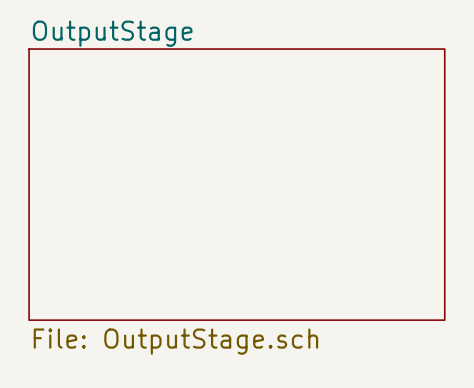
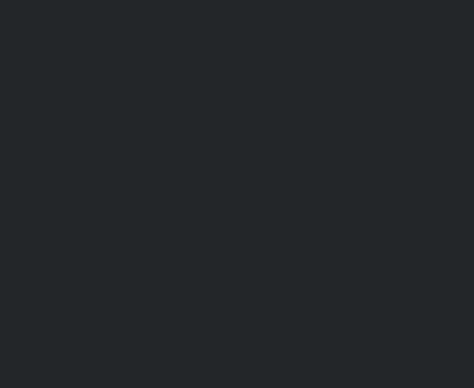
sheet OutputStage: File: OutputStage.sch (236, 184) -> none

